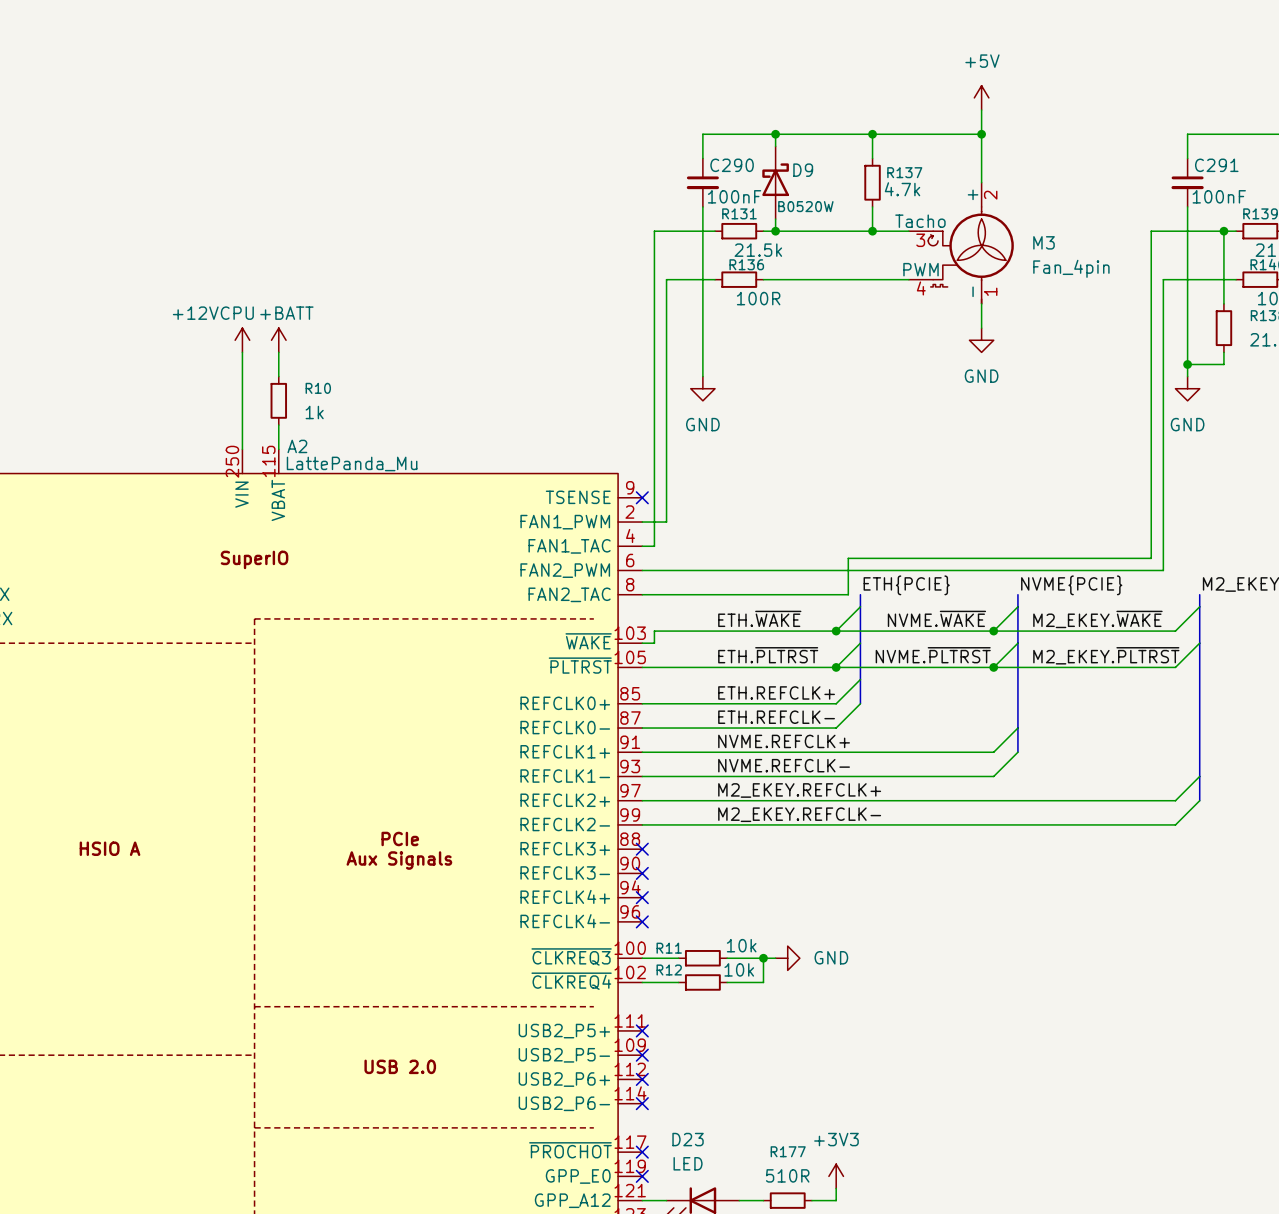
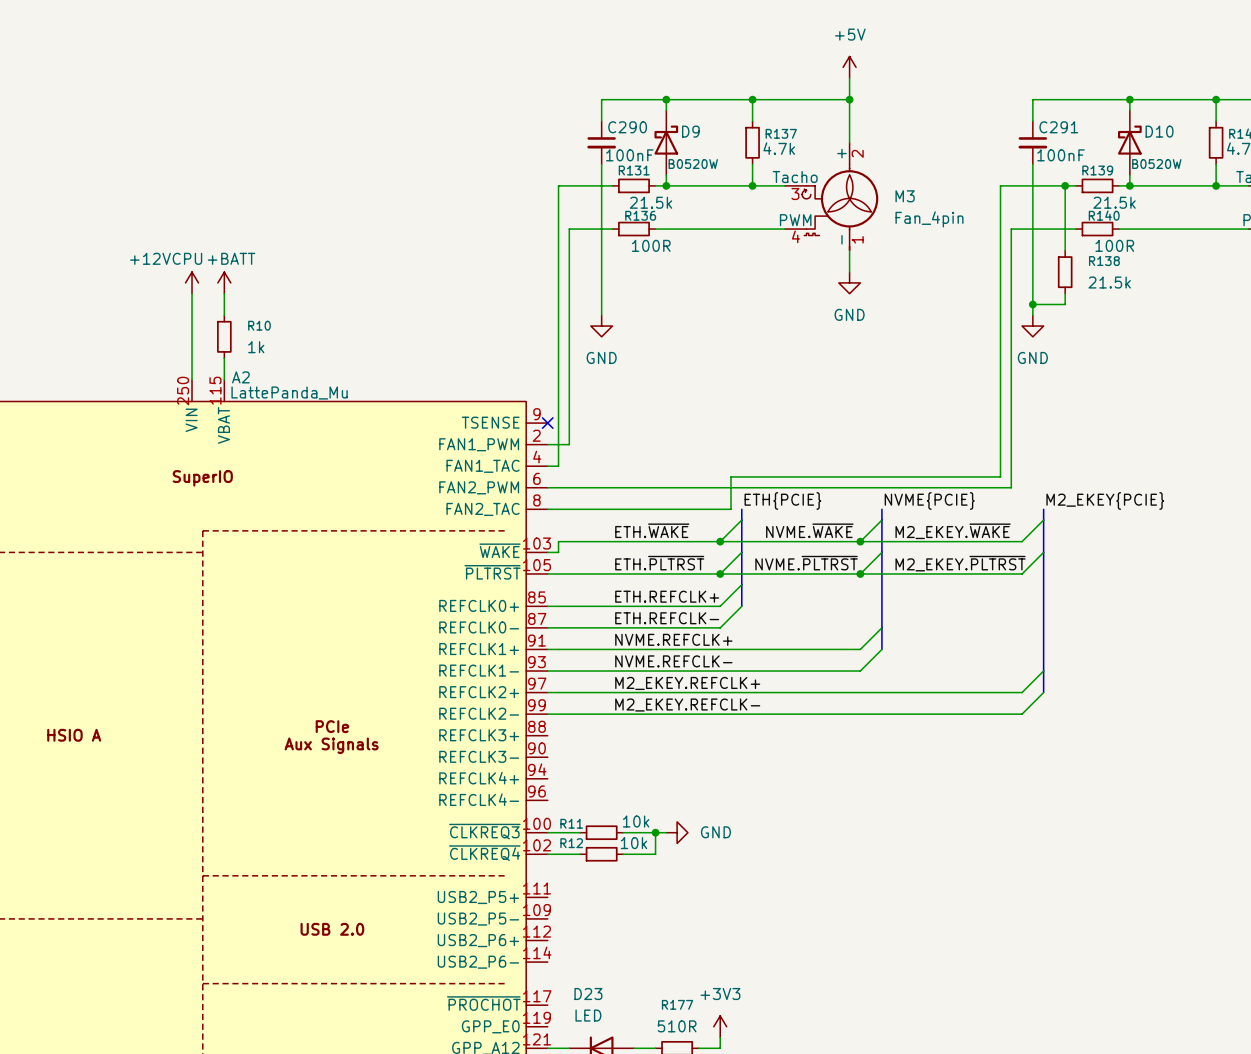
no-connect mark: (642, 849) -> none
no-connect mark: (642, 873) -> none
no-connect mark: (642, 897) -> none
no-connect mark: (642, 921) -> none
no-connect mark: (642, 1030) -> none
no-connect mark: (642, 1055) -> none
no-connect mark: (642, 1079) -> none
no-connect mark: (642, 1103) -> none
no-connect mark: (642, 1152) -> none
no-connect mark: (642, 1176) -> none

